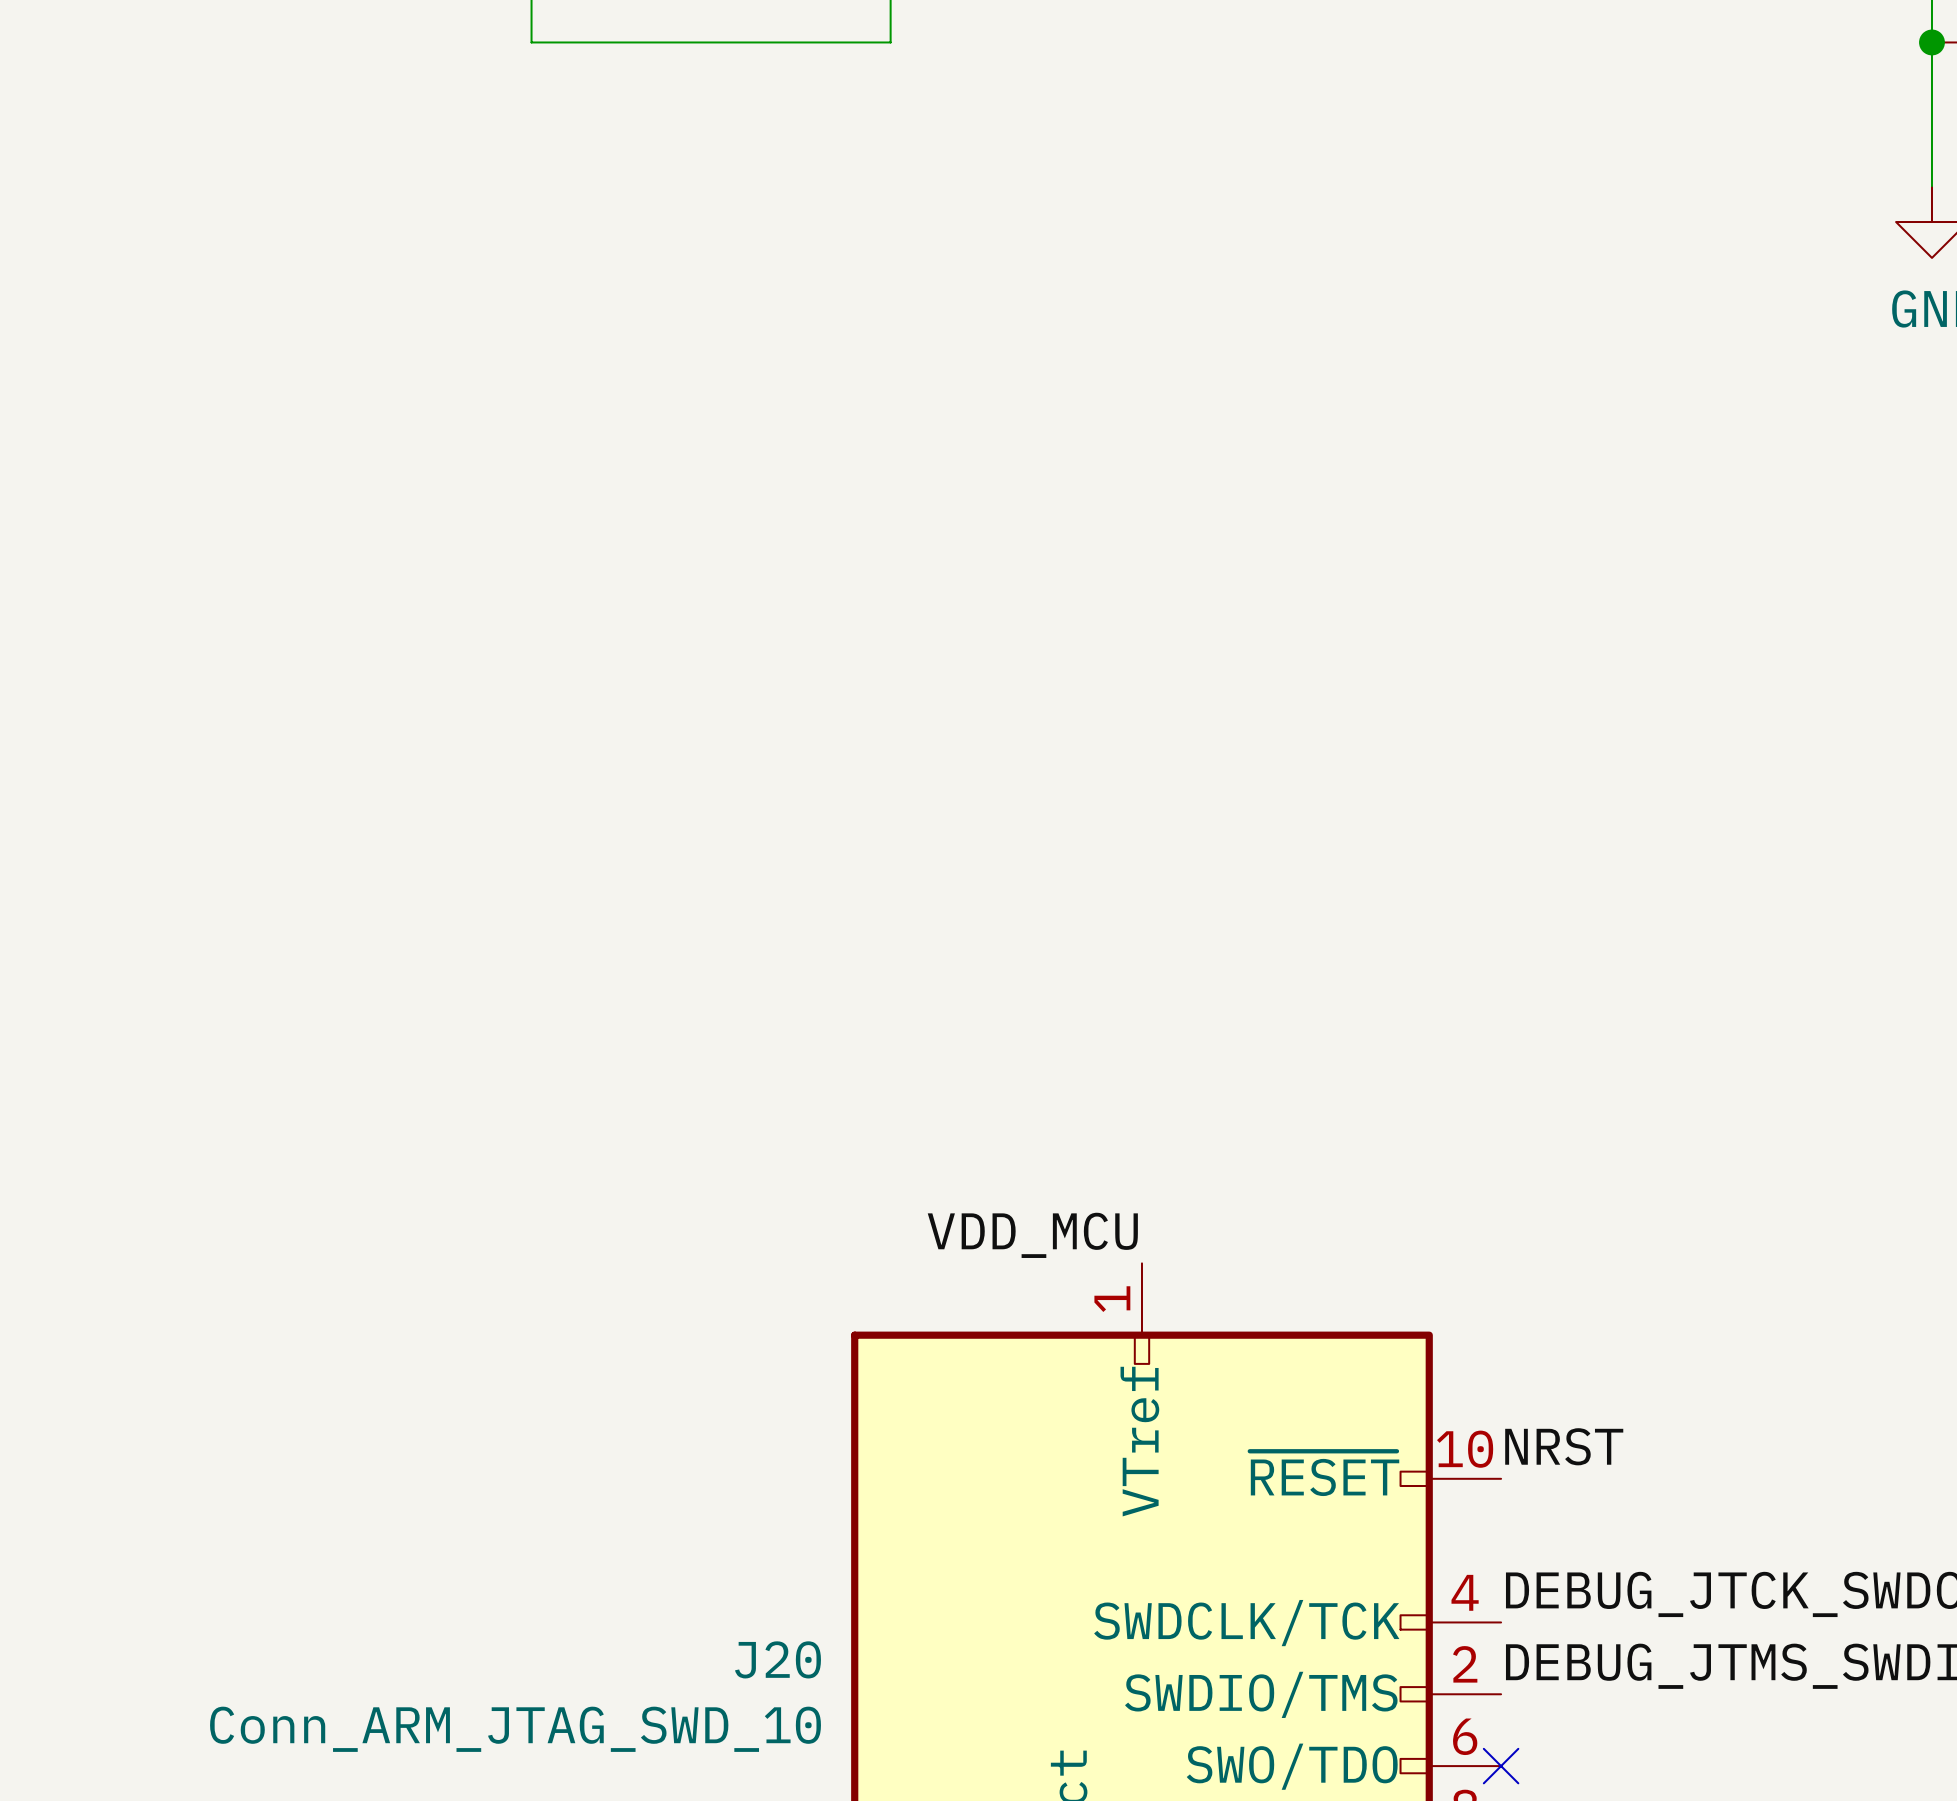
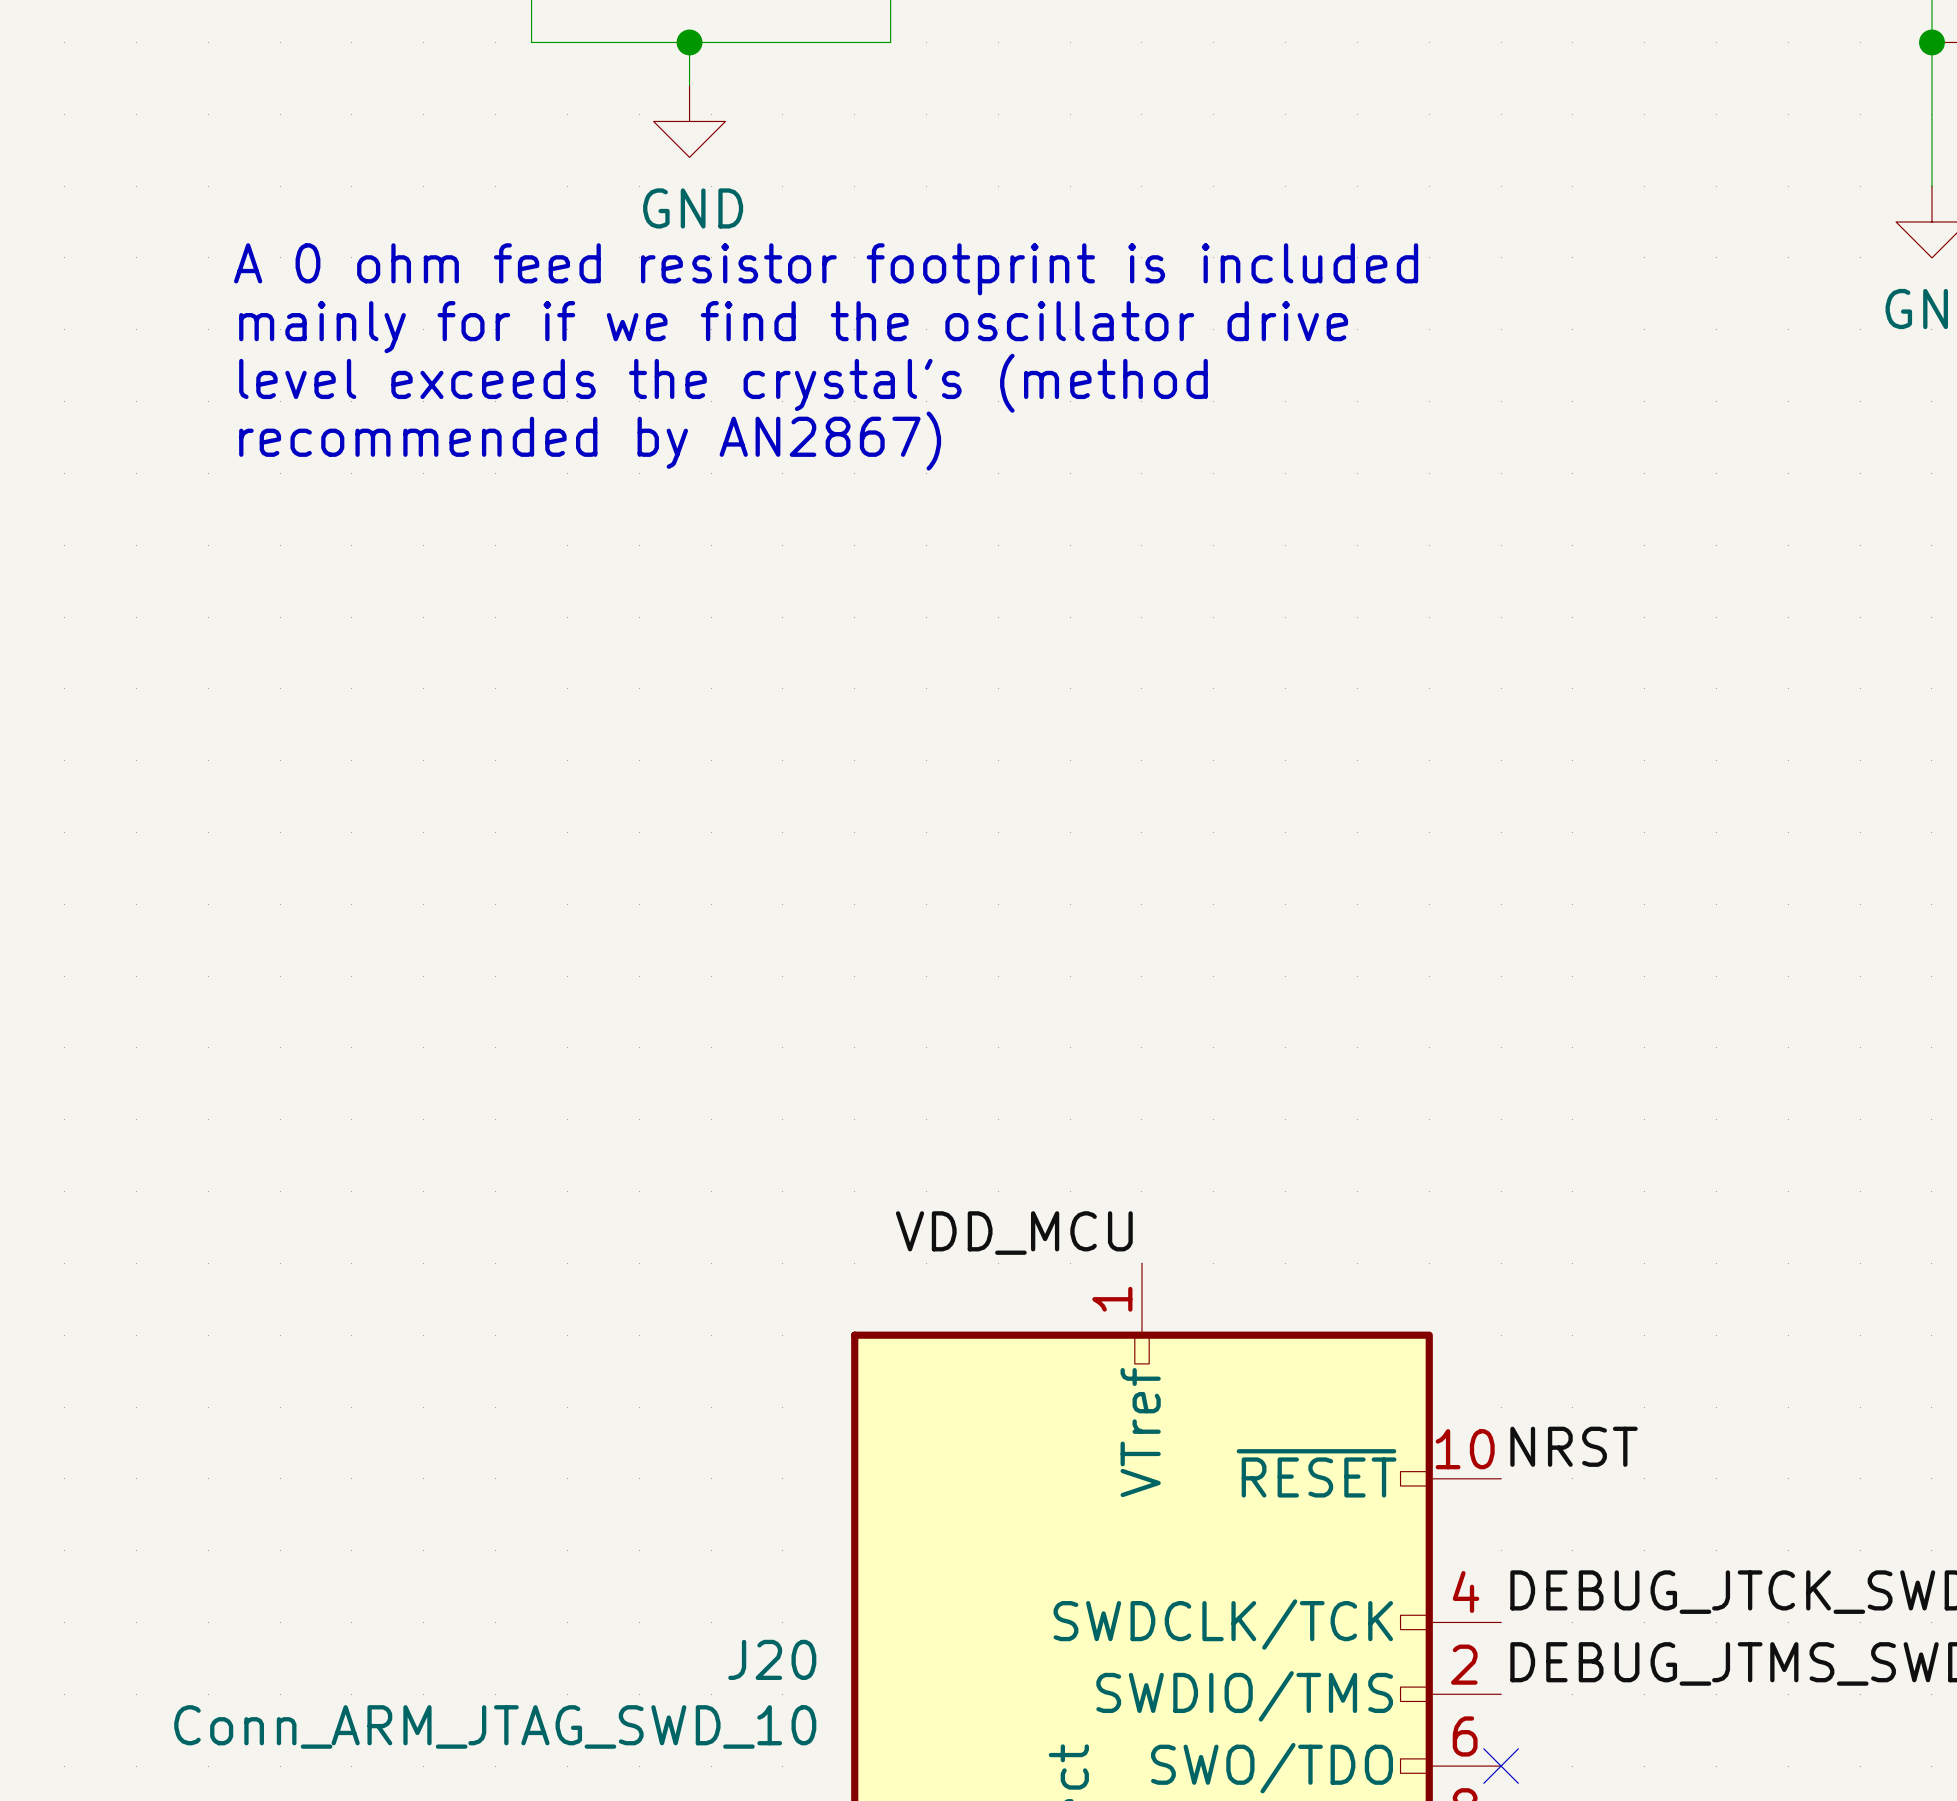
wire: none -> (689, 42) (689, 85)
junction: none -> (689, 42)
power symbol: none -> GND (689, 121)
text: none -> A 0 ohm feed resistor footprint is included (826, 269)
text: none -> mainly for if we find the oscillator drive (793, 327)
text: none -> level exceeds the crystal's (method (723, 383)
text: none -> recommended by AN2867) (590, 441)

